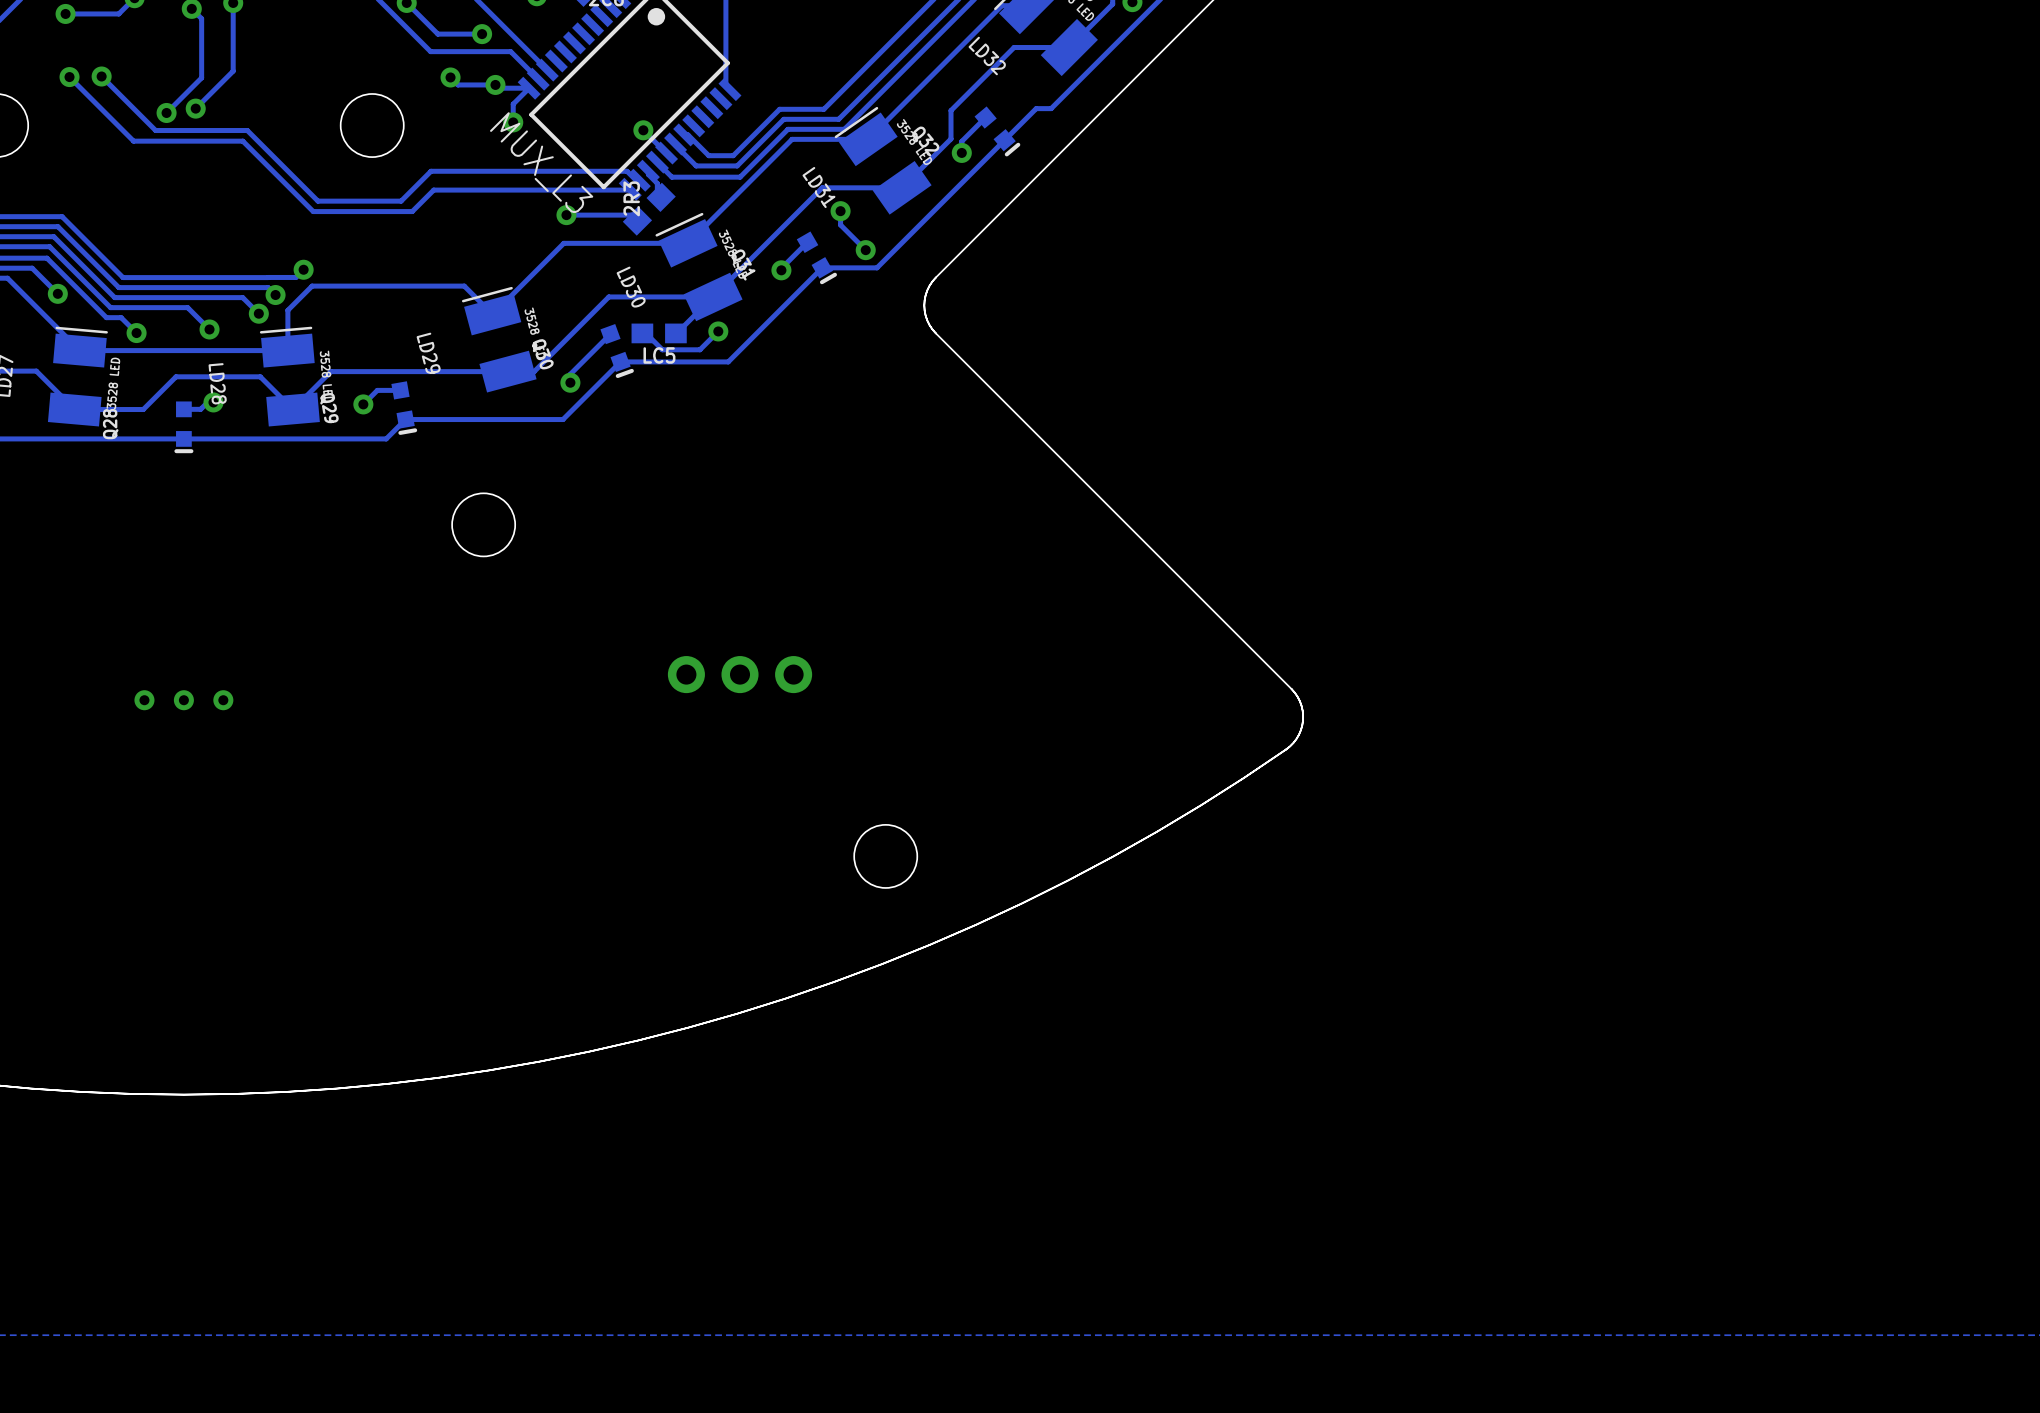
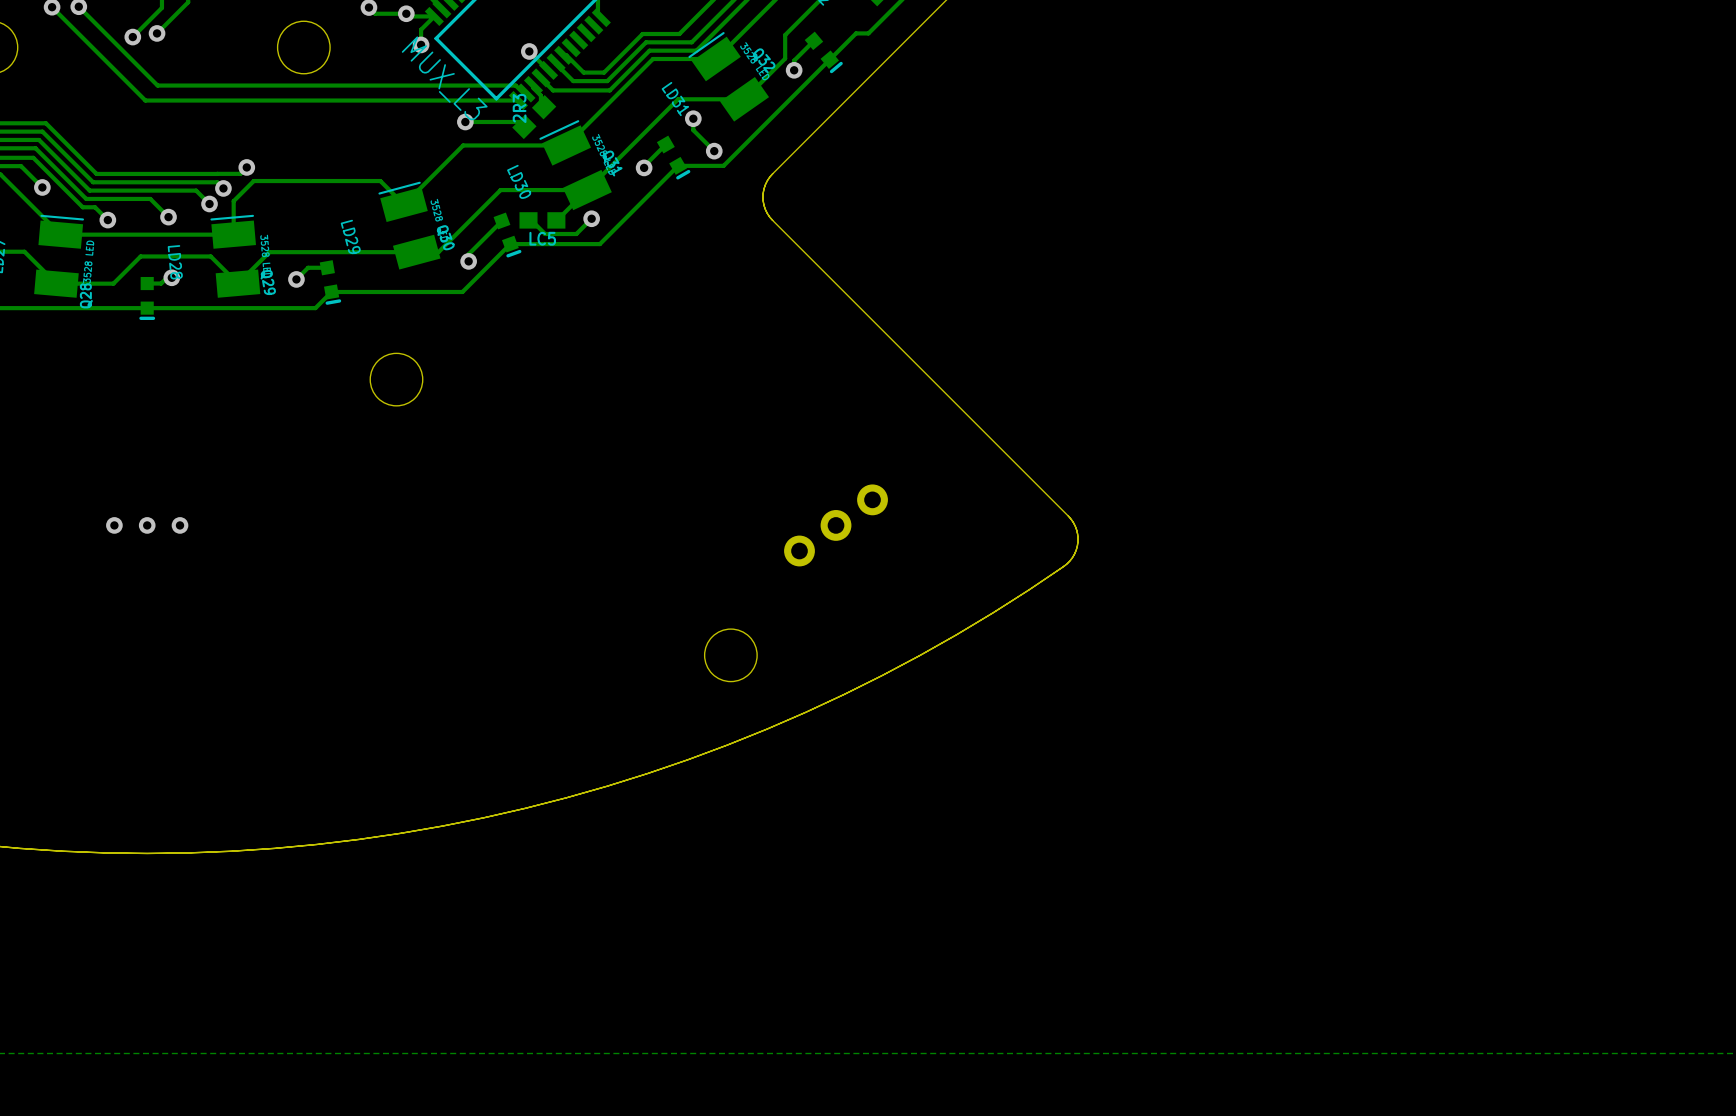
track: (155, 130) (247, 130) (317, 201) (401, 201) (430, 171) -> (123, 51) (157, 85) (352, 85)
track: (133, 141) (242, 141) (313, 211) (412, 211) (433, 190) (630, 189) -> (105, 60) (145, 100) (518, 100)
part: (740, 674) -> none
part: none -> (836, 525)

